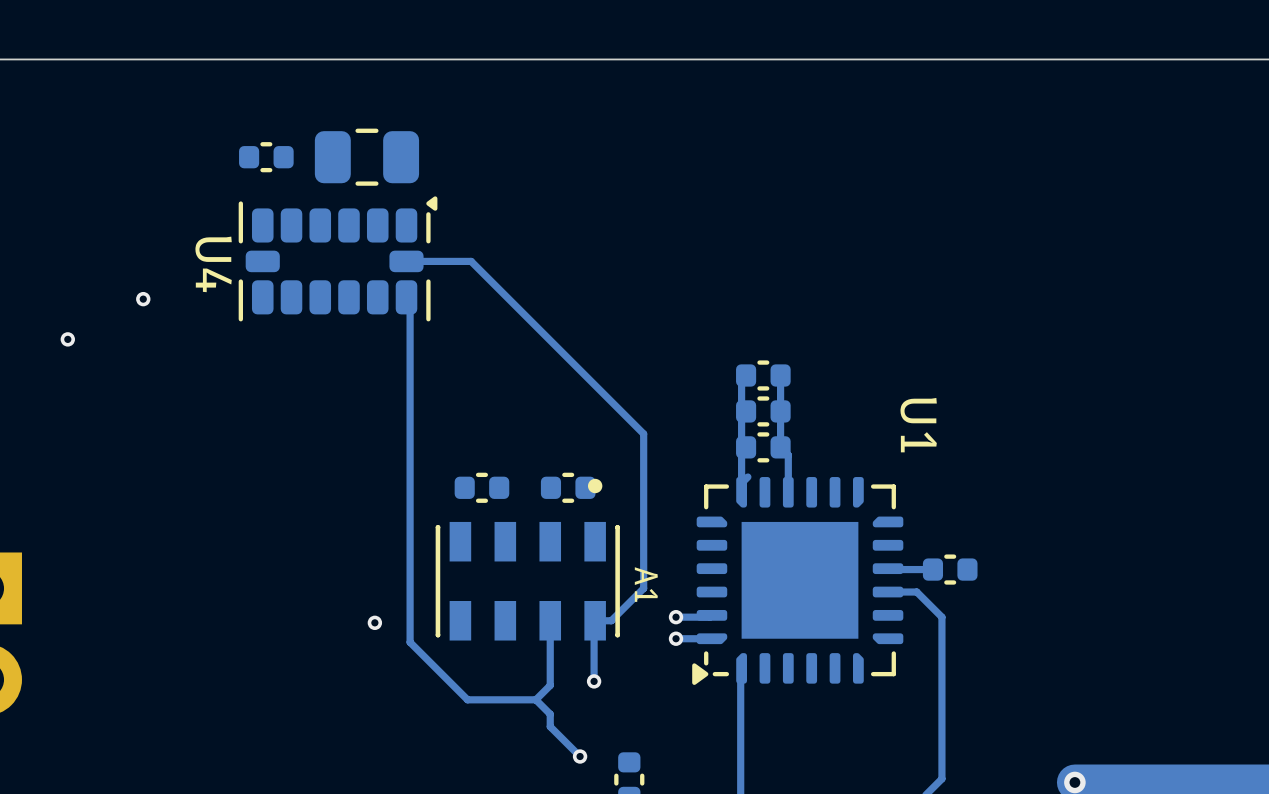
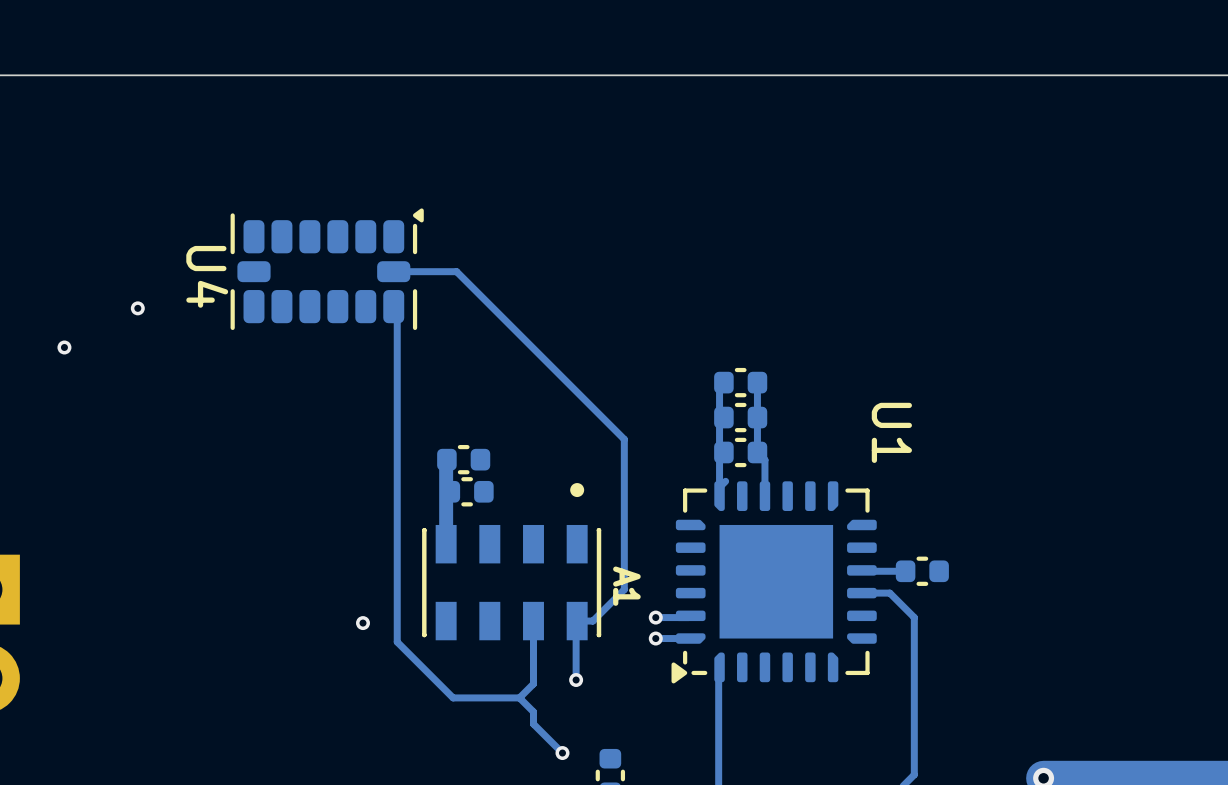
part: (266, 157) -> none
part: (366, 157) -> none
track: none -> (449, 459) (446, 463) (446, 544)
part position: (568, 487) -> (463, 459)

